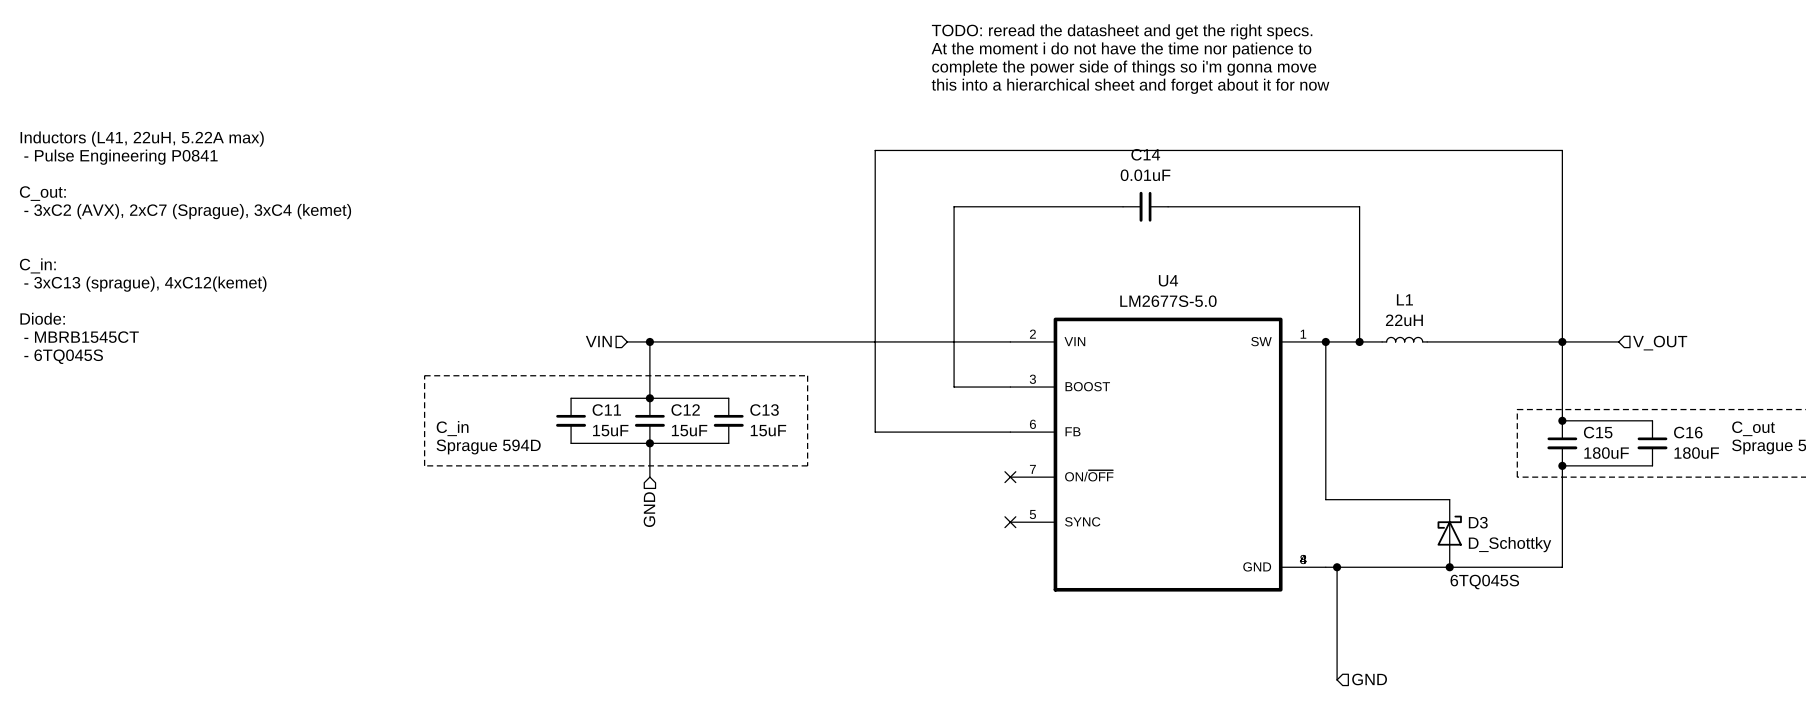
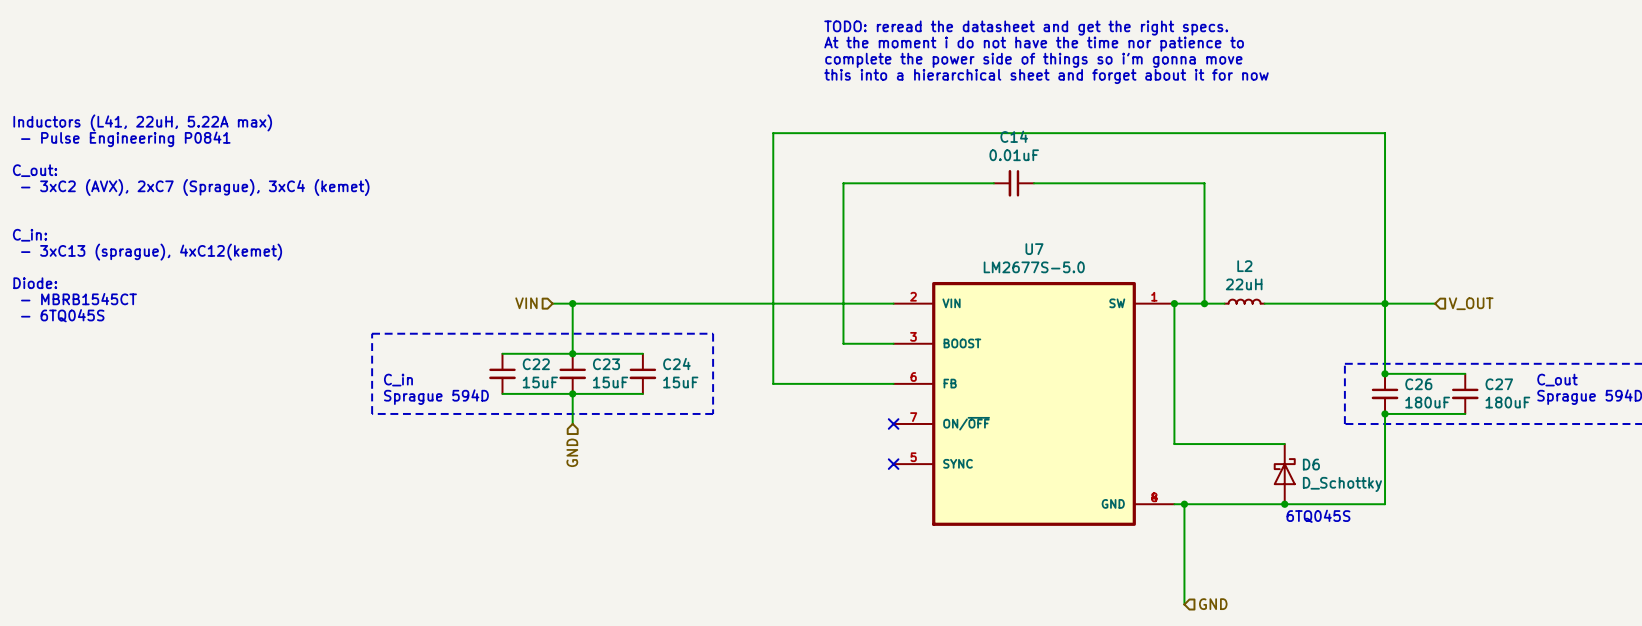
U4 name: U4 (1168, 280) -> U7 (1034, 249)
L1 name: L1 (1404, 299) -> L2 (1244, 266)
C11 name: C11 (606, 410) -> C22 (536, 364)
C12 name: C12 (685, 410) -> C23 (606, 364)
C13 name: C13 (764, 410) -> C24 (676, 364)
C15 name: C15 (1598, 432) -> C26 (1418, 384)
C16 name: C16 (1688, 432) -> C27 (1499, 384)
D3 name: D3 (1478, 522) -> D6 (1311, 464)

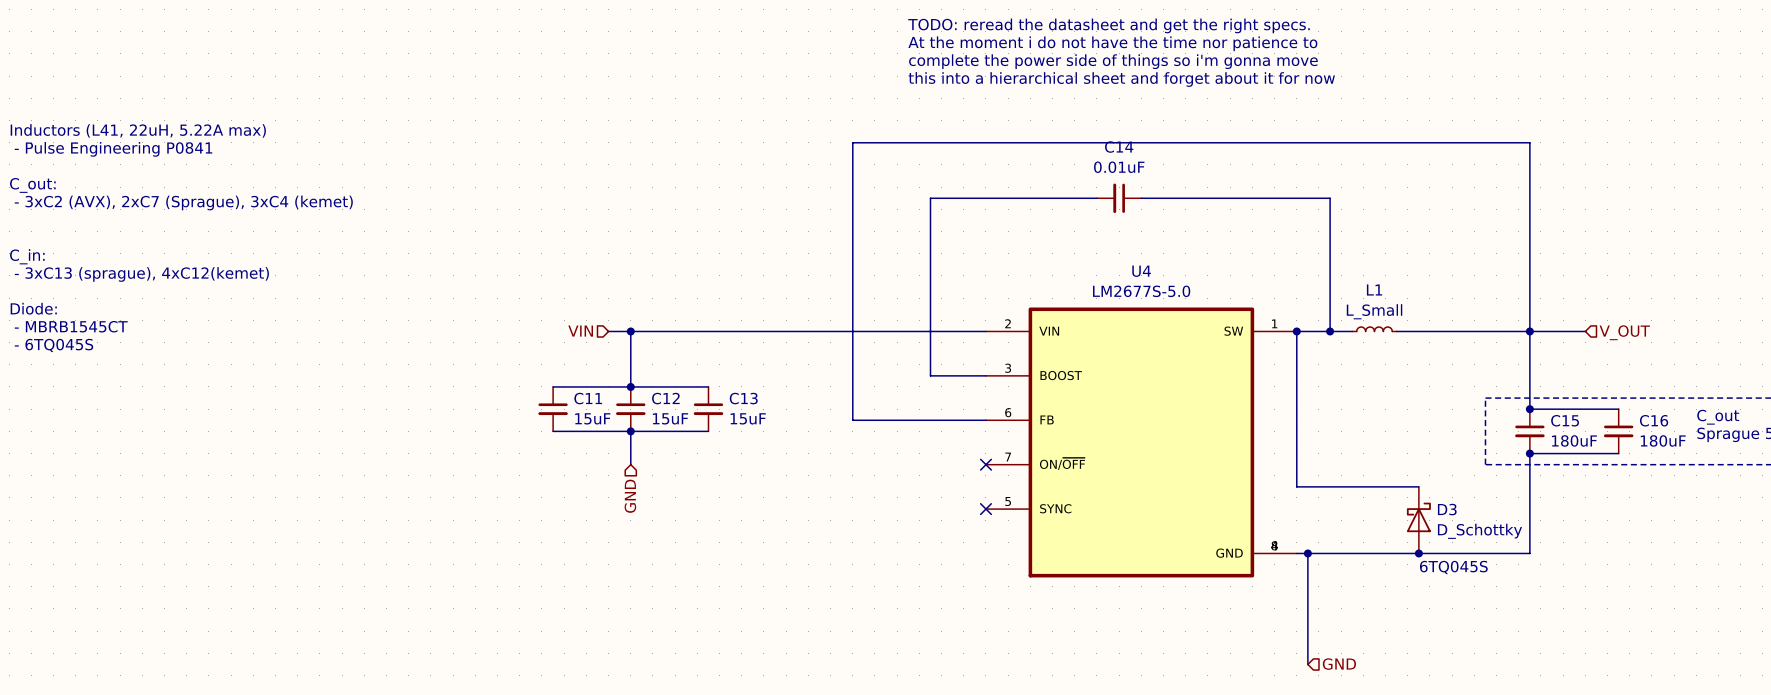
U7 name: U7 (1034, 249) -> U4 (1141, 271)
L2 name: L2 (1244, 266) -> L1 (1374, 289)
L2 value: 22uH (1244, 284) -> L_Small (1374, 311)
line: (372, 333) (372, 413) (713, 413) (713, 333) (372, 333) -> none
C22 name: C22 (536, 364) -> C11 (588, 398)
C23 name: C23 (606, 364) -> C12 (665, 398)
C24 name: C24 (676, 364) -> C13 (743, 398)
text: C_in (398, 380) -> none
C26 name: C26 (1418, 384) -> C15 (1565, 420)
C27 name: C27 (1499, 384) -> C16 (1654, 420)
text: Sprague 594D (436, 397) -> none
D6 name: D6 (1311, 464) -> D3 (1447, 509)

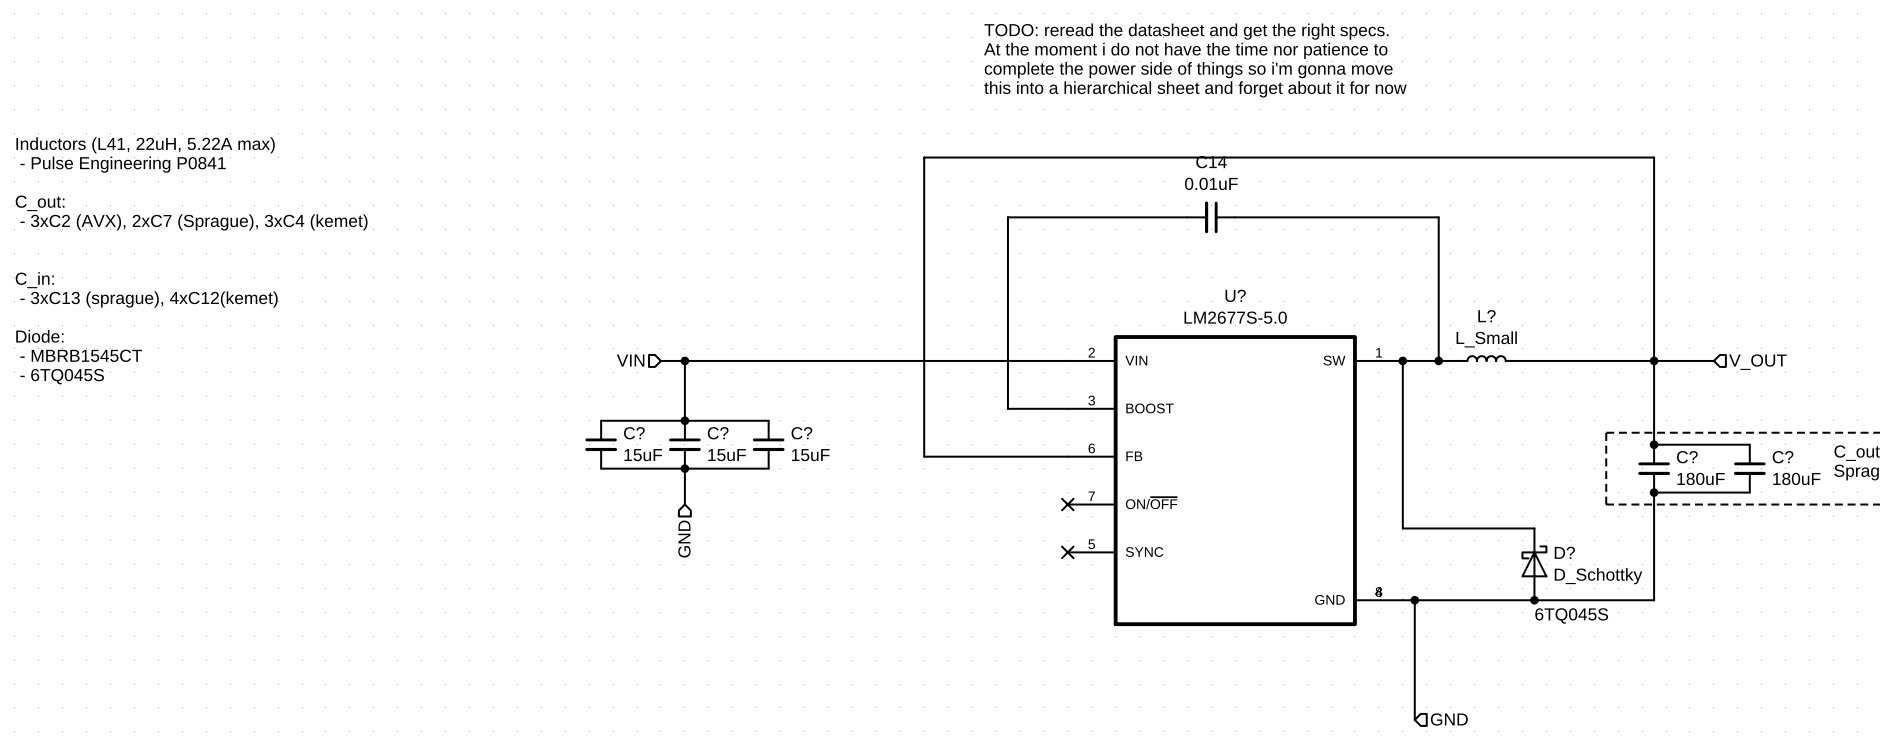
U4 name: U4 (1141, 271) -> U? (1235, 295)
L1 name: L1 (1374, 289) -> L? (1486, 316)
C11 name: C11 (588, 398) -> C? (634, 433)
C12 name: C12 (665, 398) -> C? (718, 433)
C13 name: C13 (743, 398) -> C? (801, 433)
C15 name: C15 (1565, 420) -> C? (1687, 457)
C16 name: C16 (1654, 420) -> C? (1783, 457)
D3 name: D3 (1447, 509) -> D? (1564, 552)

